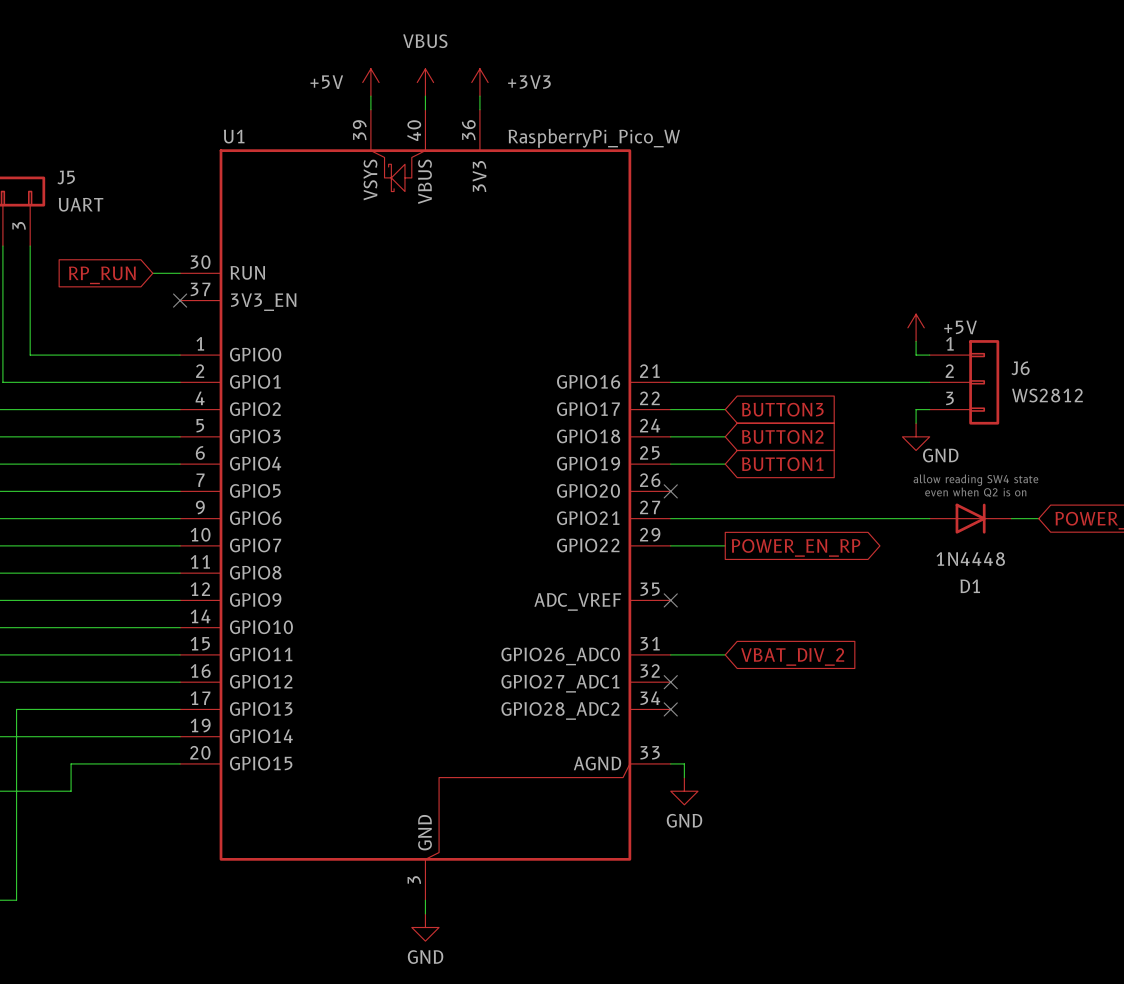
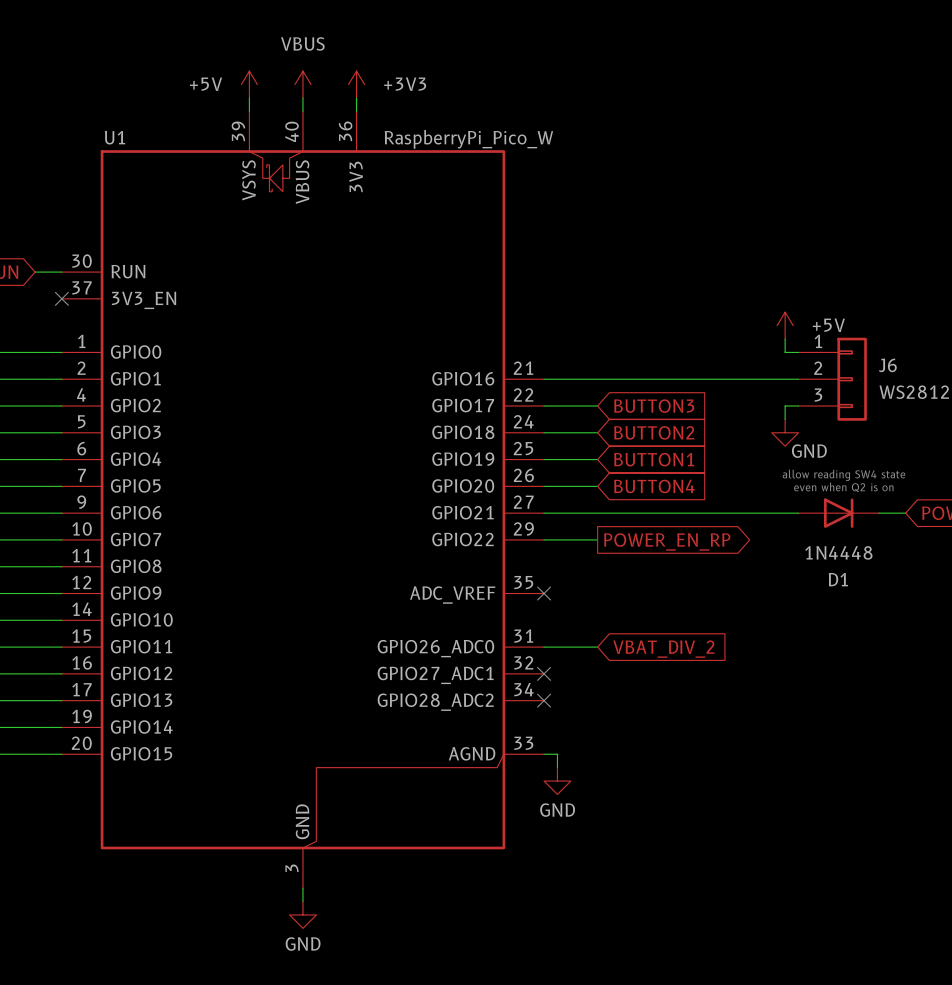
wire: none -> (544, 486) (597, 486)
no-connect mark: (670, 491) -> none
global label: none -> BUTTON4 (654, 486)

